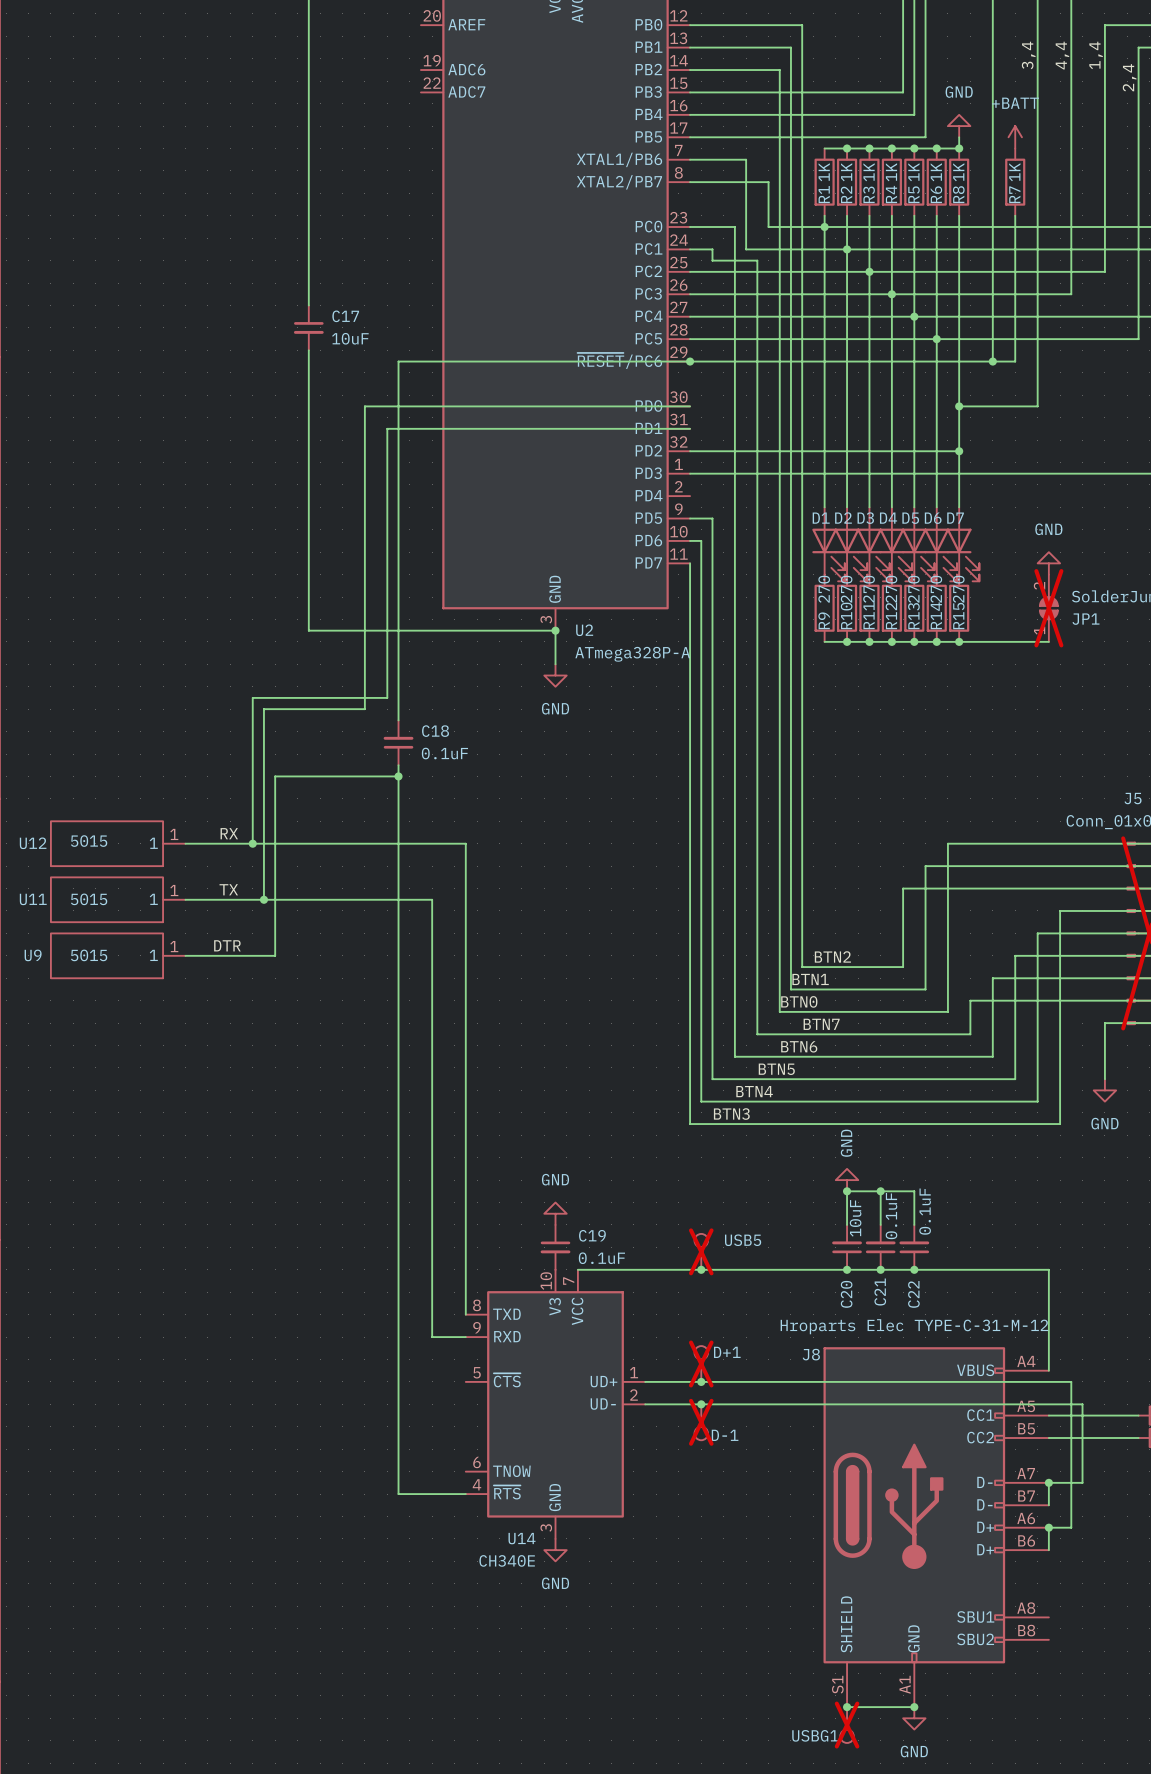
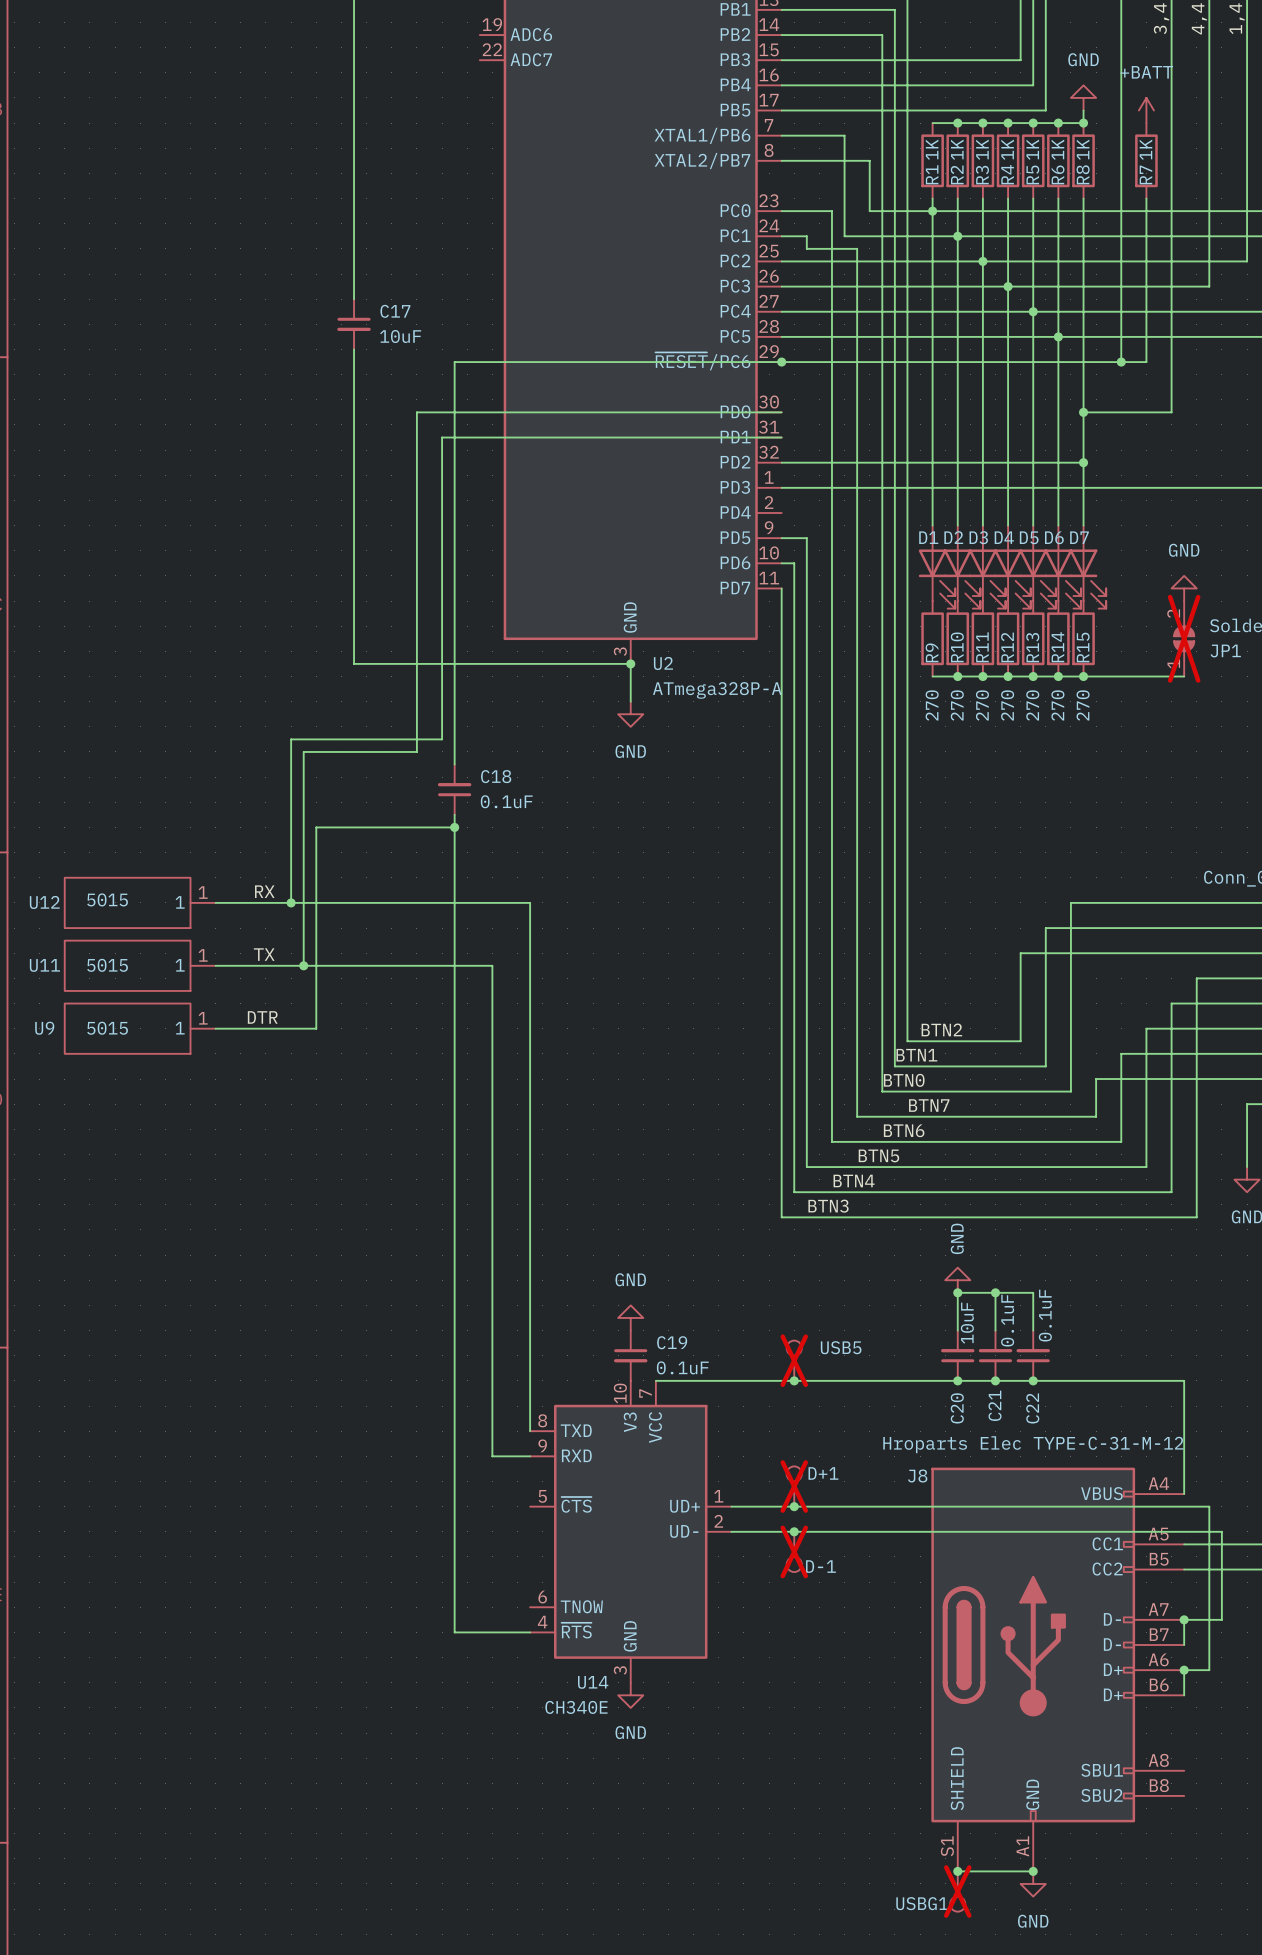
R9 value position: 270 (824, 589) -> 270 (932, 705)
R10 value position: 270 (846, 589) -> 270 (957, 705)
R11 value position: 270 (869, 589) -> 270 (982, 705)
R12 value position: 270 (891, 589) -> 270 (1007, 705)
R13 value position: 270 (913, 589) -> 270 (1032, 705)
R14 value position: 270 (936, 589) -> 270 (1057, 705)
R15 value position: 270 (958, 589) -> 270 (1083, 705)

